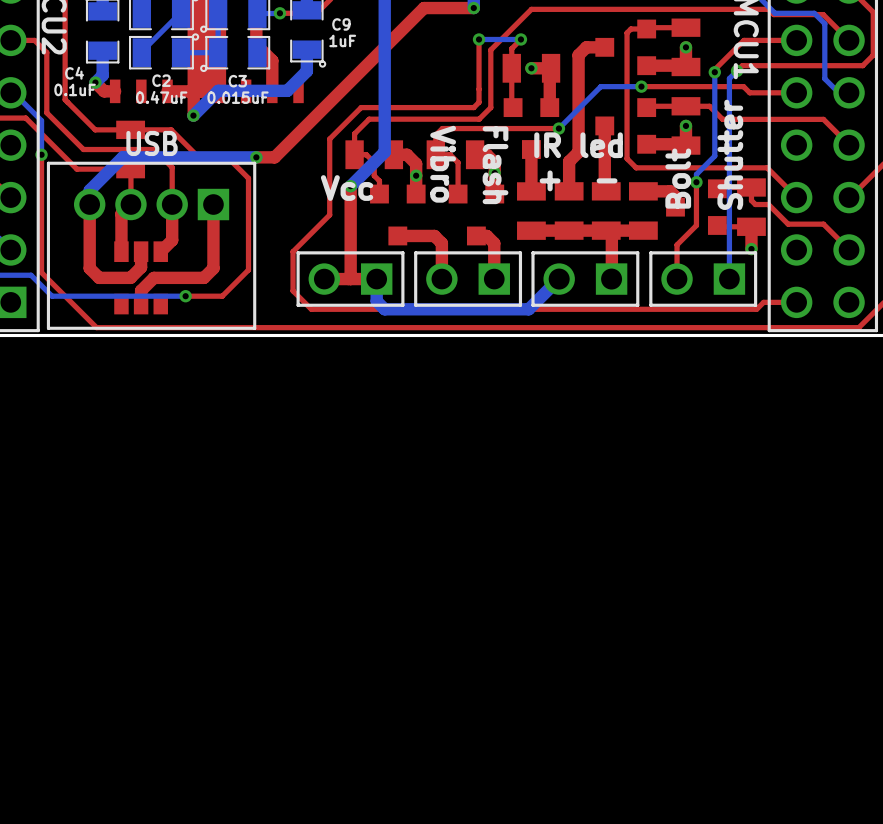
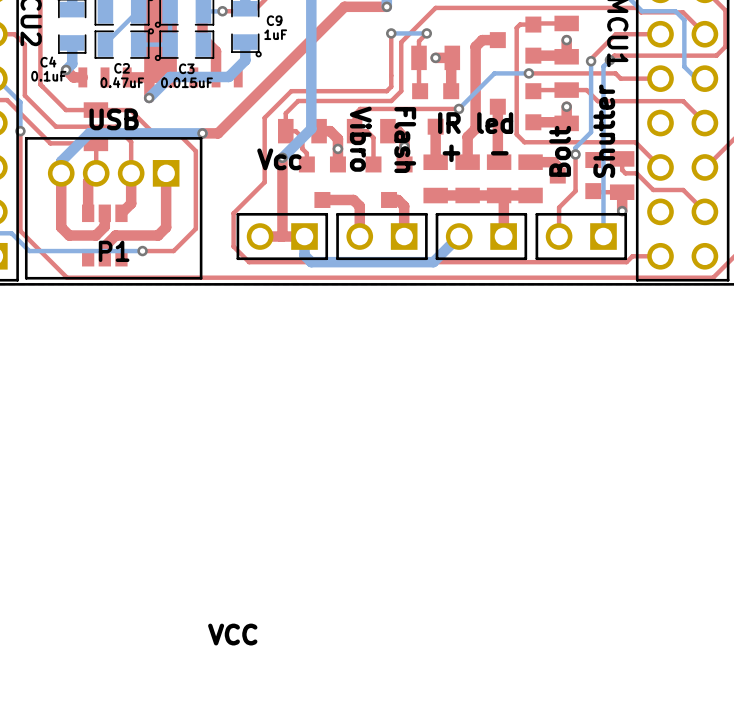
text: none -> USB (114, 119)
P1 value: USB (152, 143) -> none
P1 name: none -> P1 (114, 251)
text: none -> VCC (232, 634)

